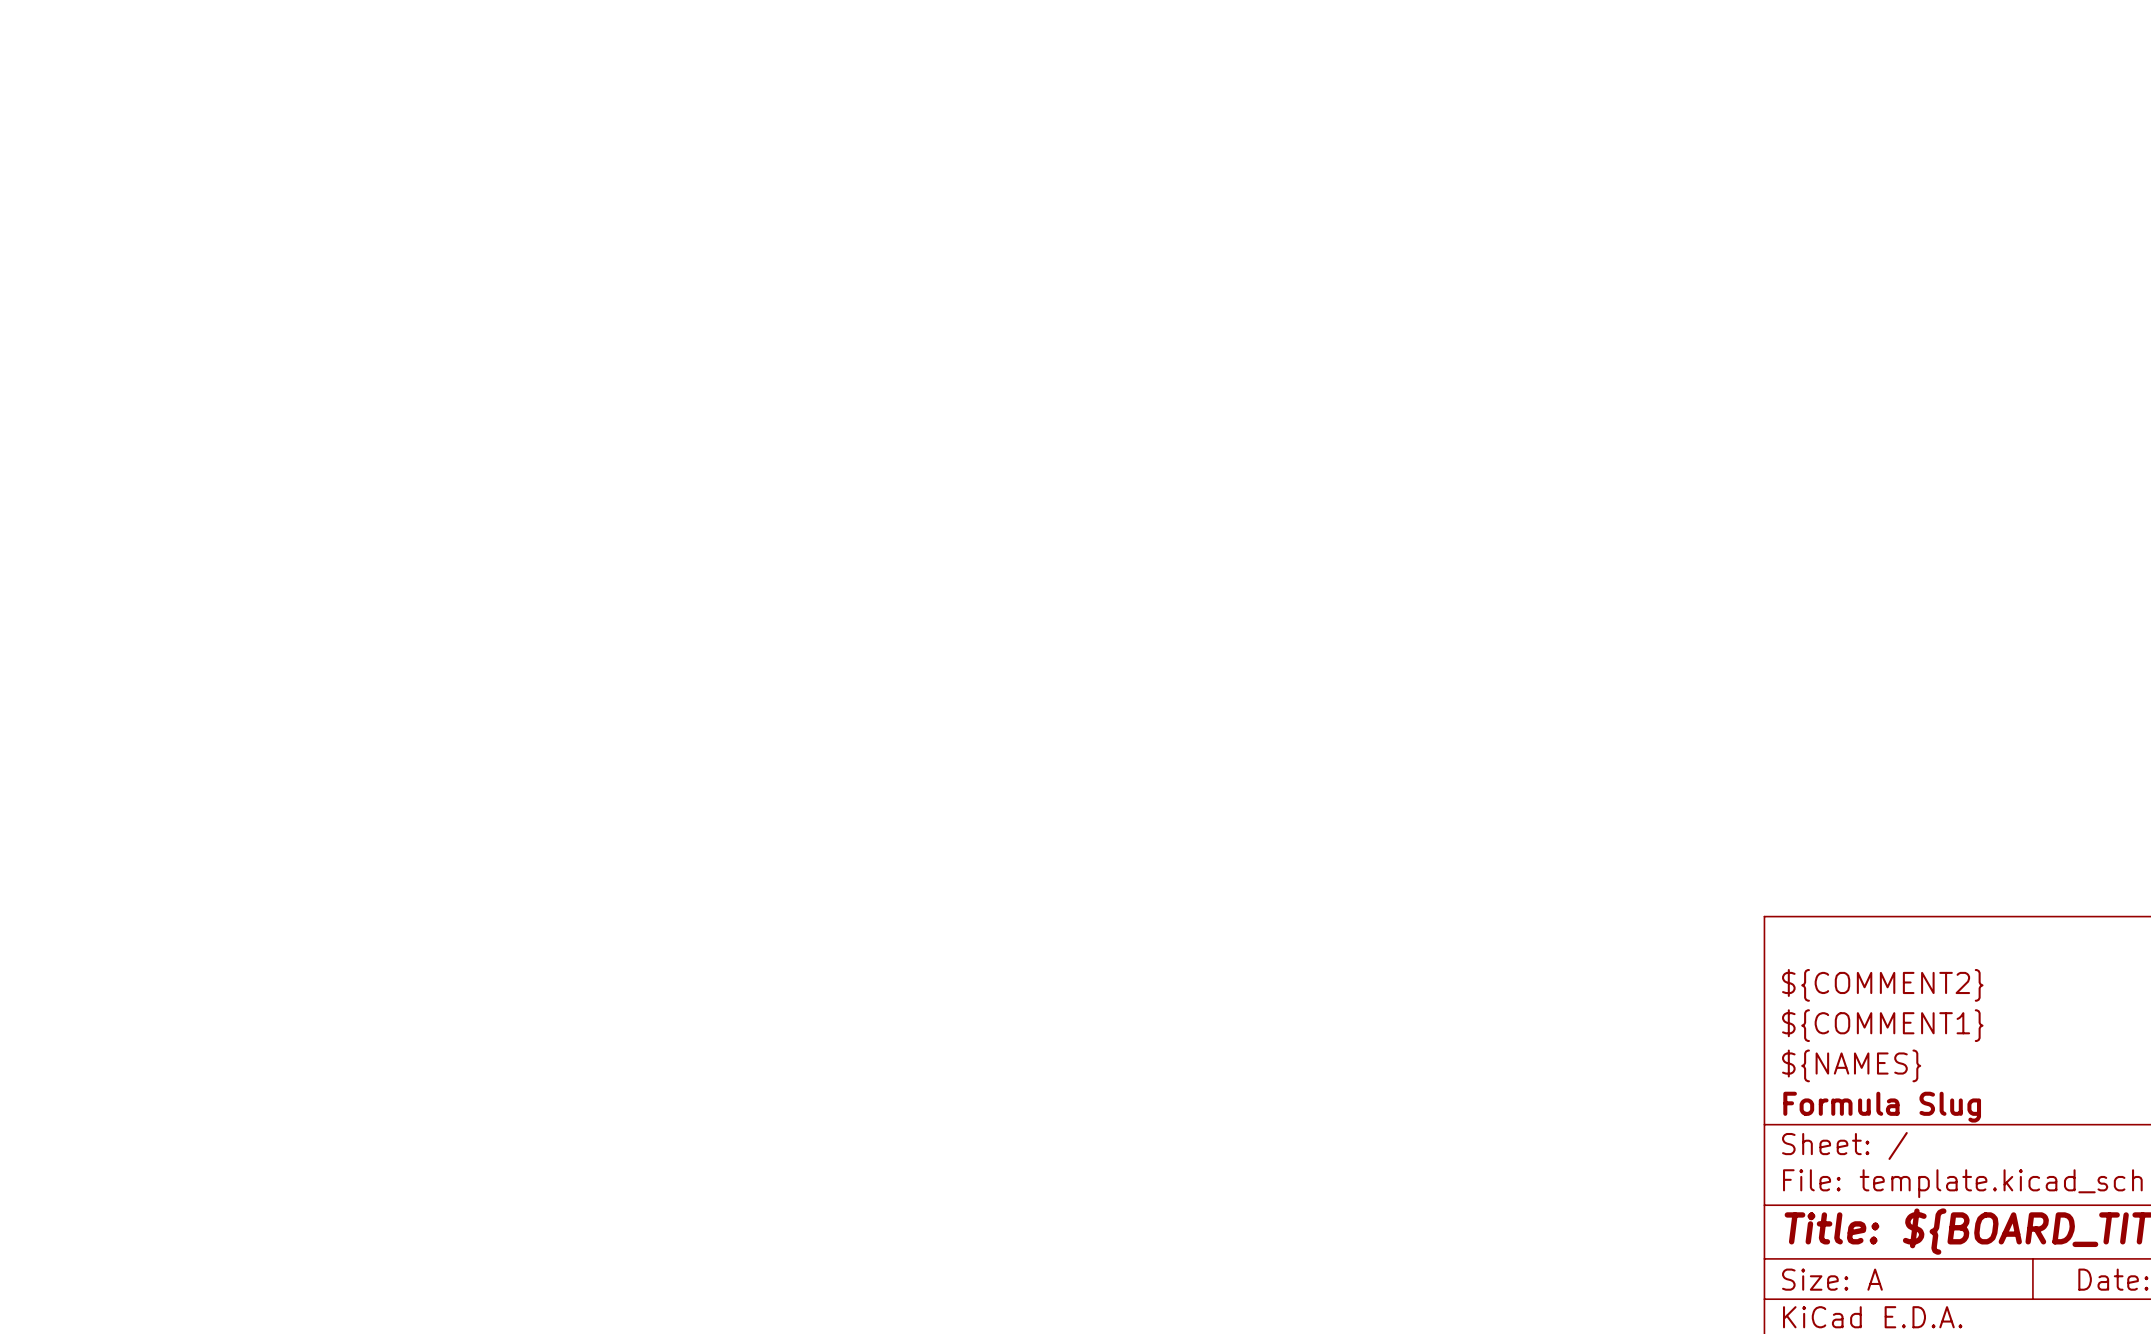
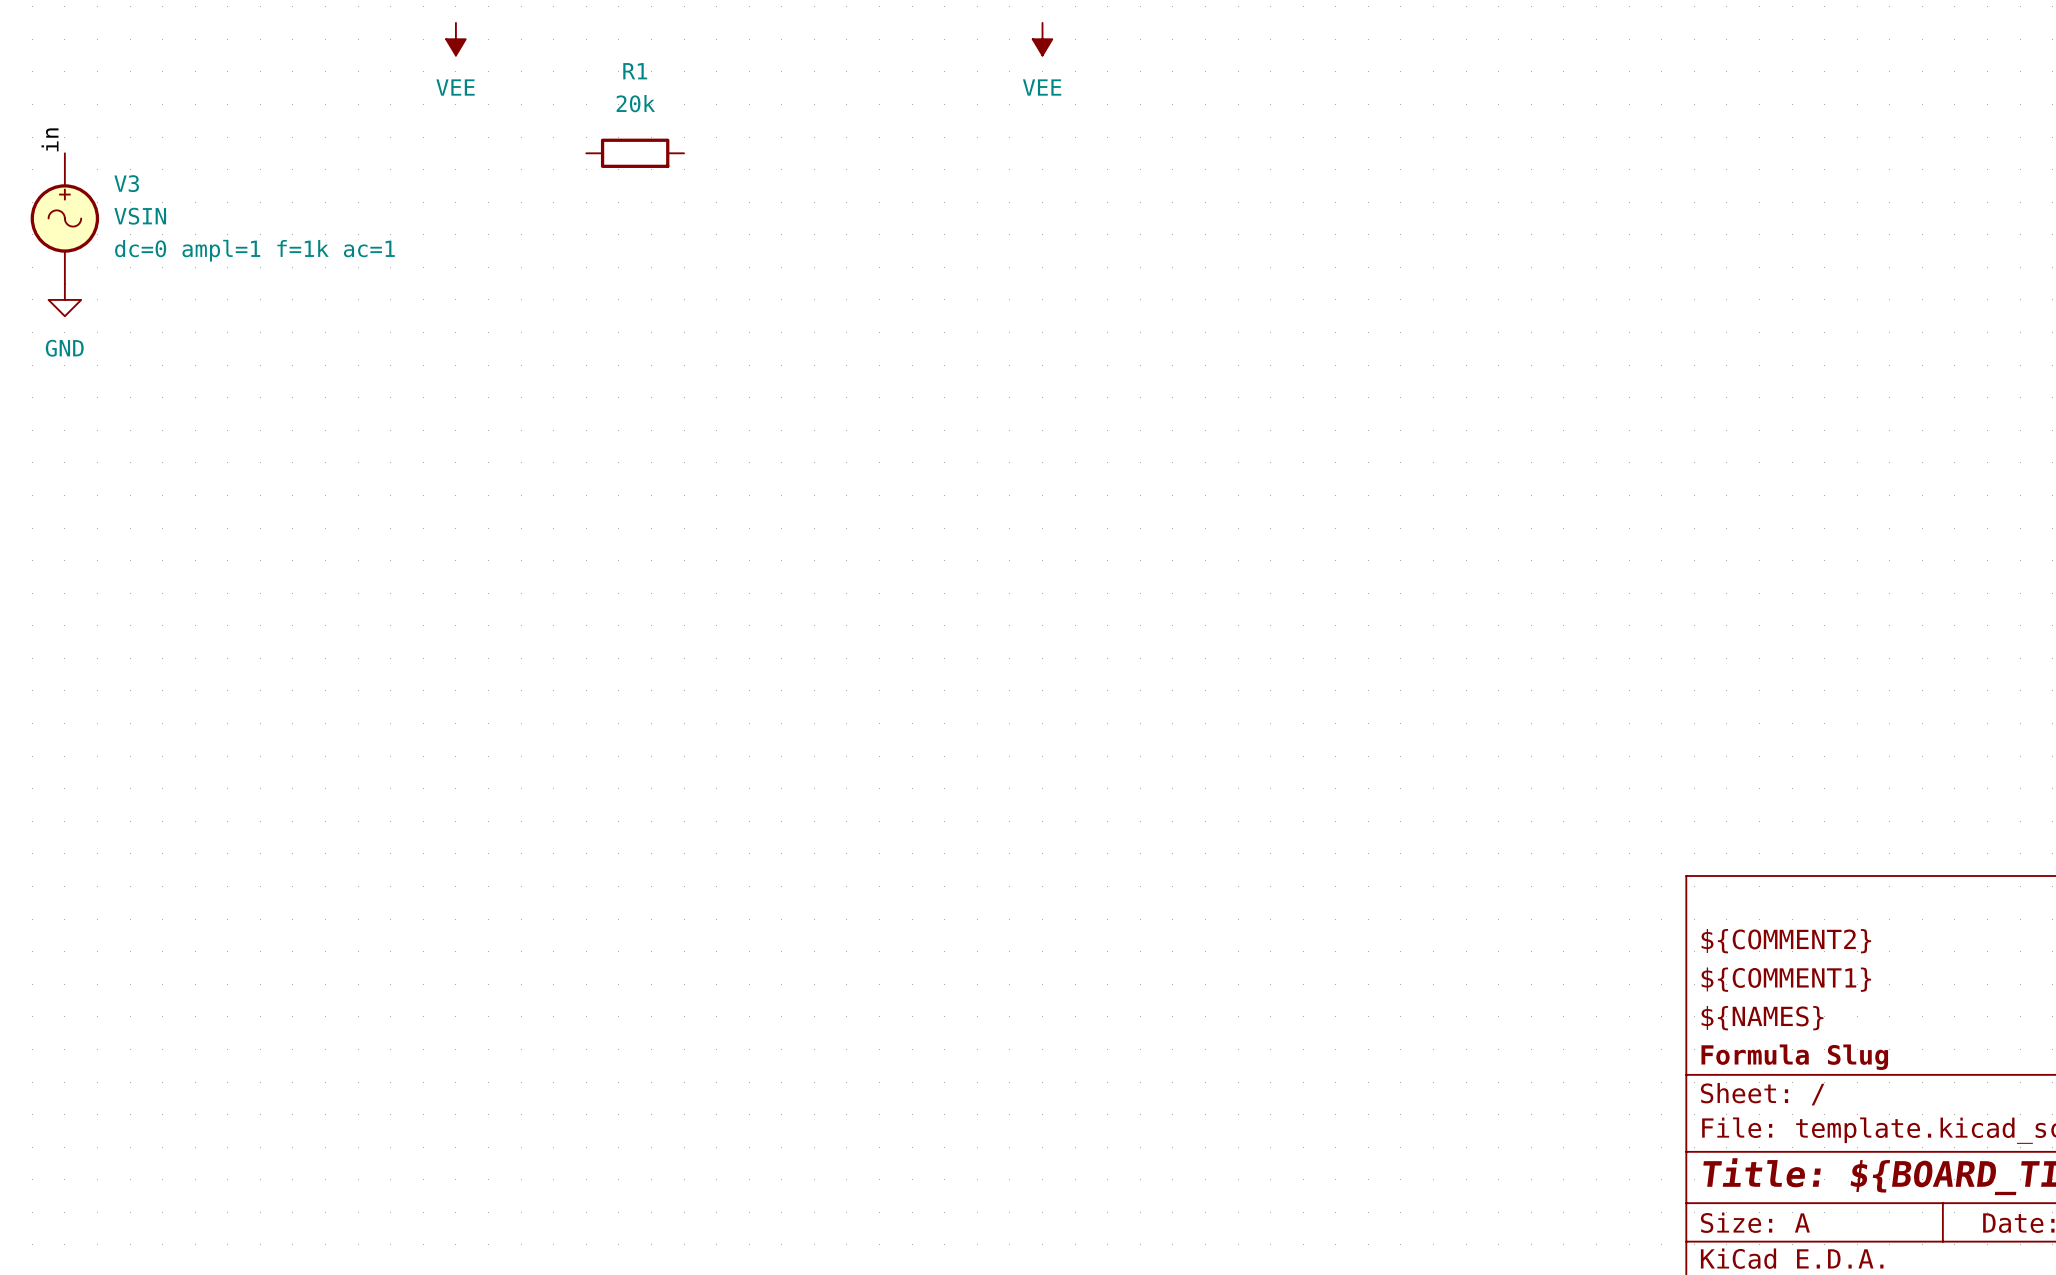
power symbol: none -> VEE (455, 39)
power symbol: none -> VEE (1042, 39)
label: none -> in (49, 139)
R1: none -> 20k (635, 153)
V3: none -> VSIN (64, 218)
power symbol: none -> GND (64, 299)

